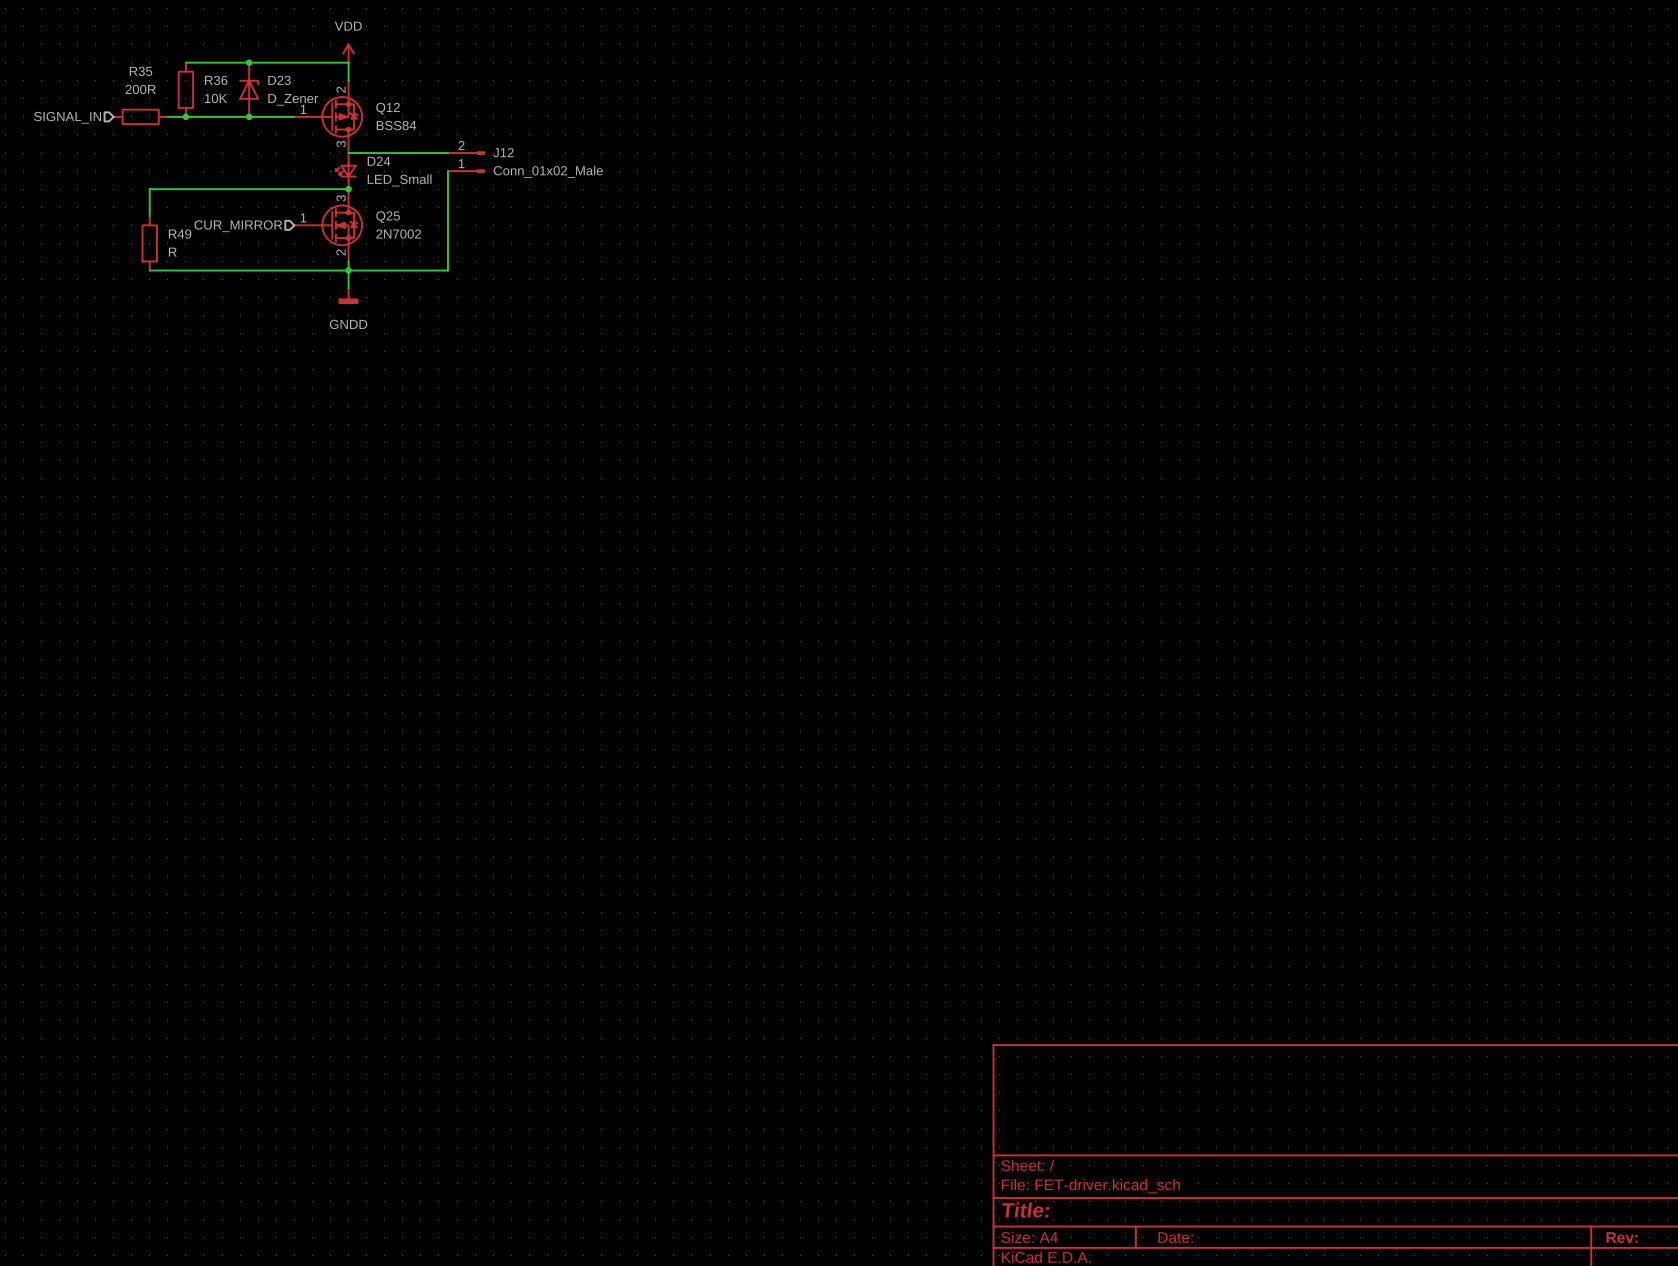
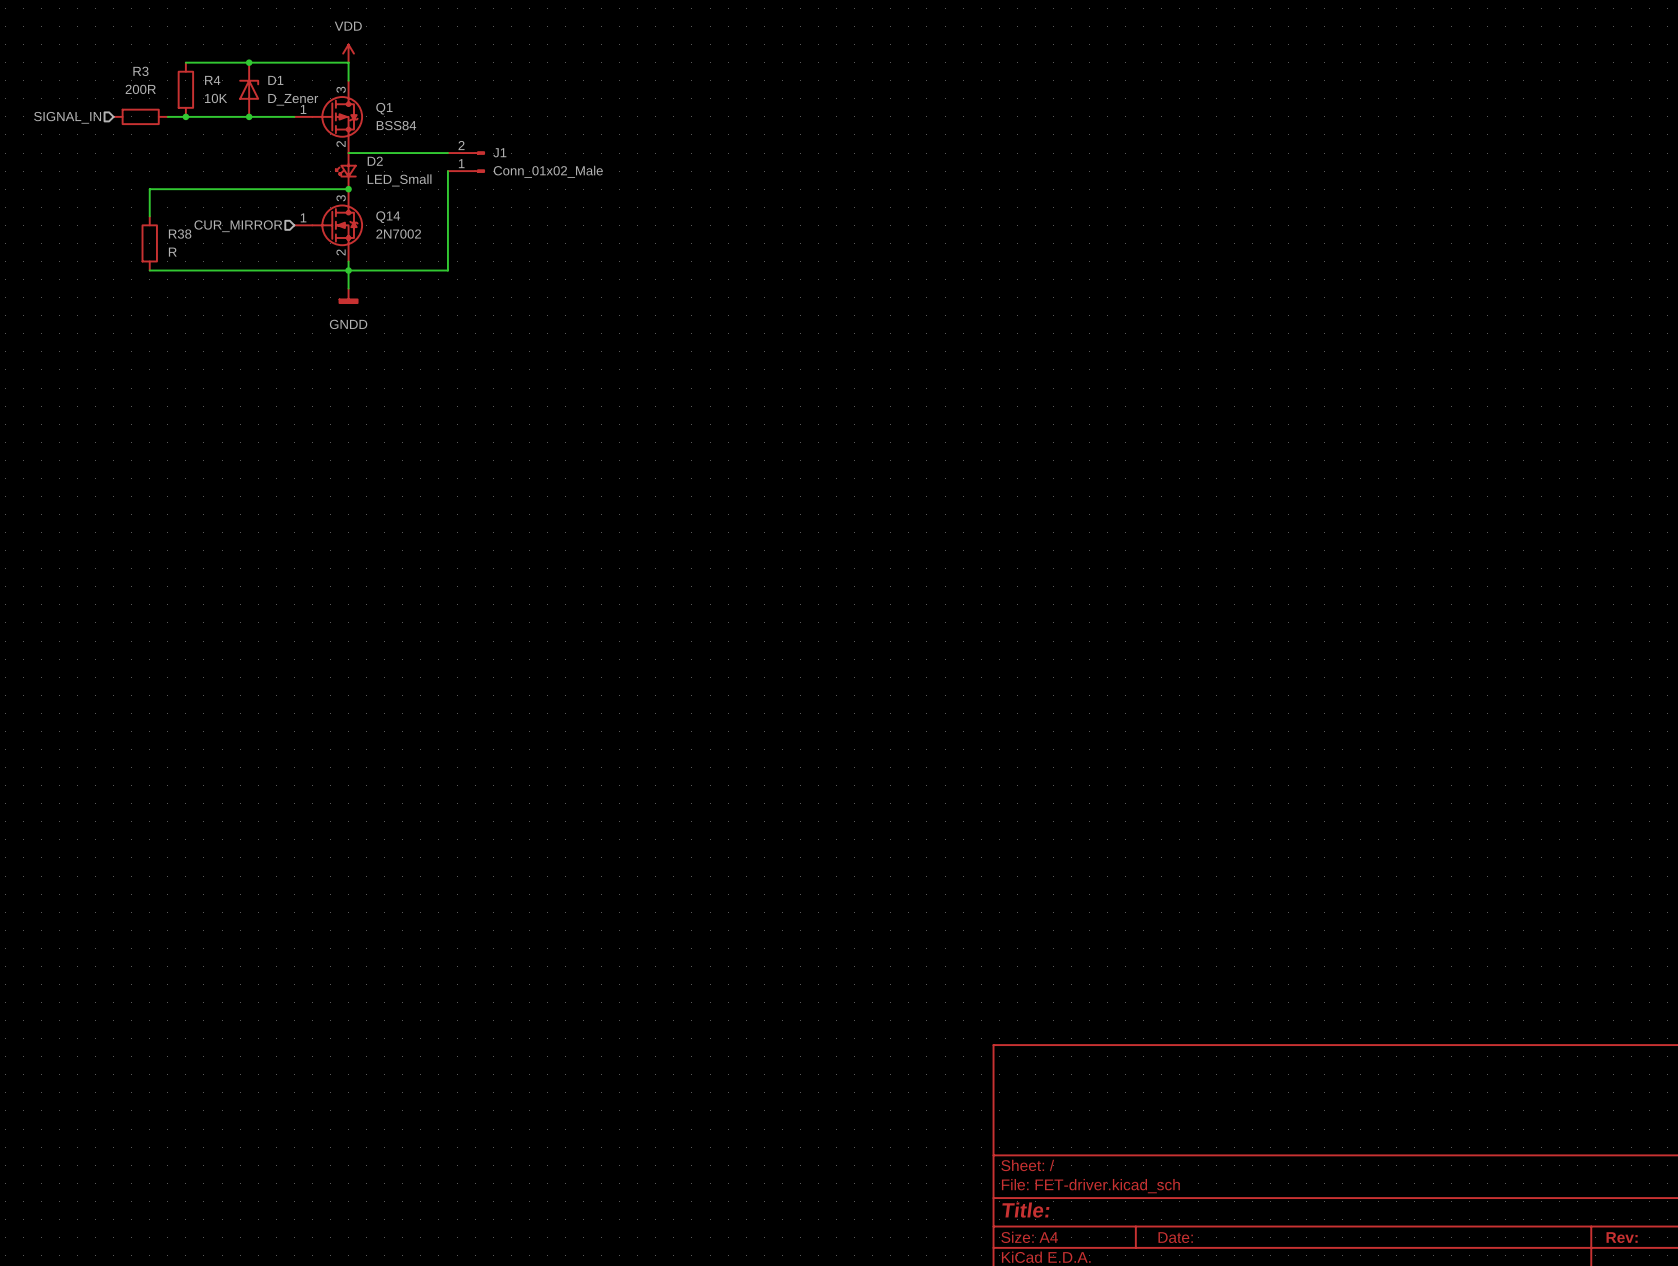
R35 name: R35 (140, 71) -> R3 (140, 71)
R36 name: R36 (216, 80) -> R4 (212, 80)
D23 name: D23 (279, 80) -> D1 (275, 80)
Q12: BSS84 (328, 116) -> none
Q1: none -> BSS84 (328, 116)
J12 name: J12 (503, 152) -> J1 (499, 152)
D24 name: D24 (379, 161) -> D2 (375, 161)
Q25 name: Q25 (388, 217) -> Q14 (388, 217)
R49 name: R49 (180, 234) -> R38 (180, 234)

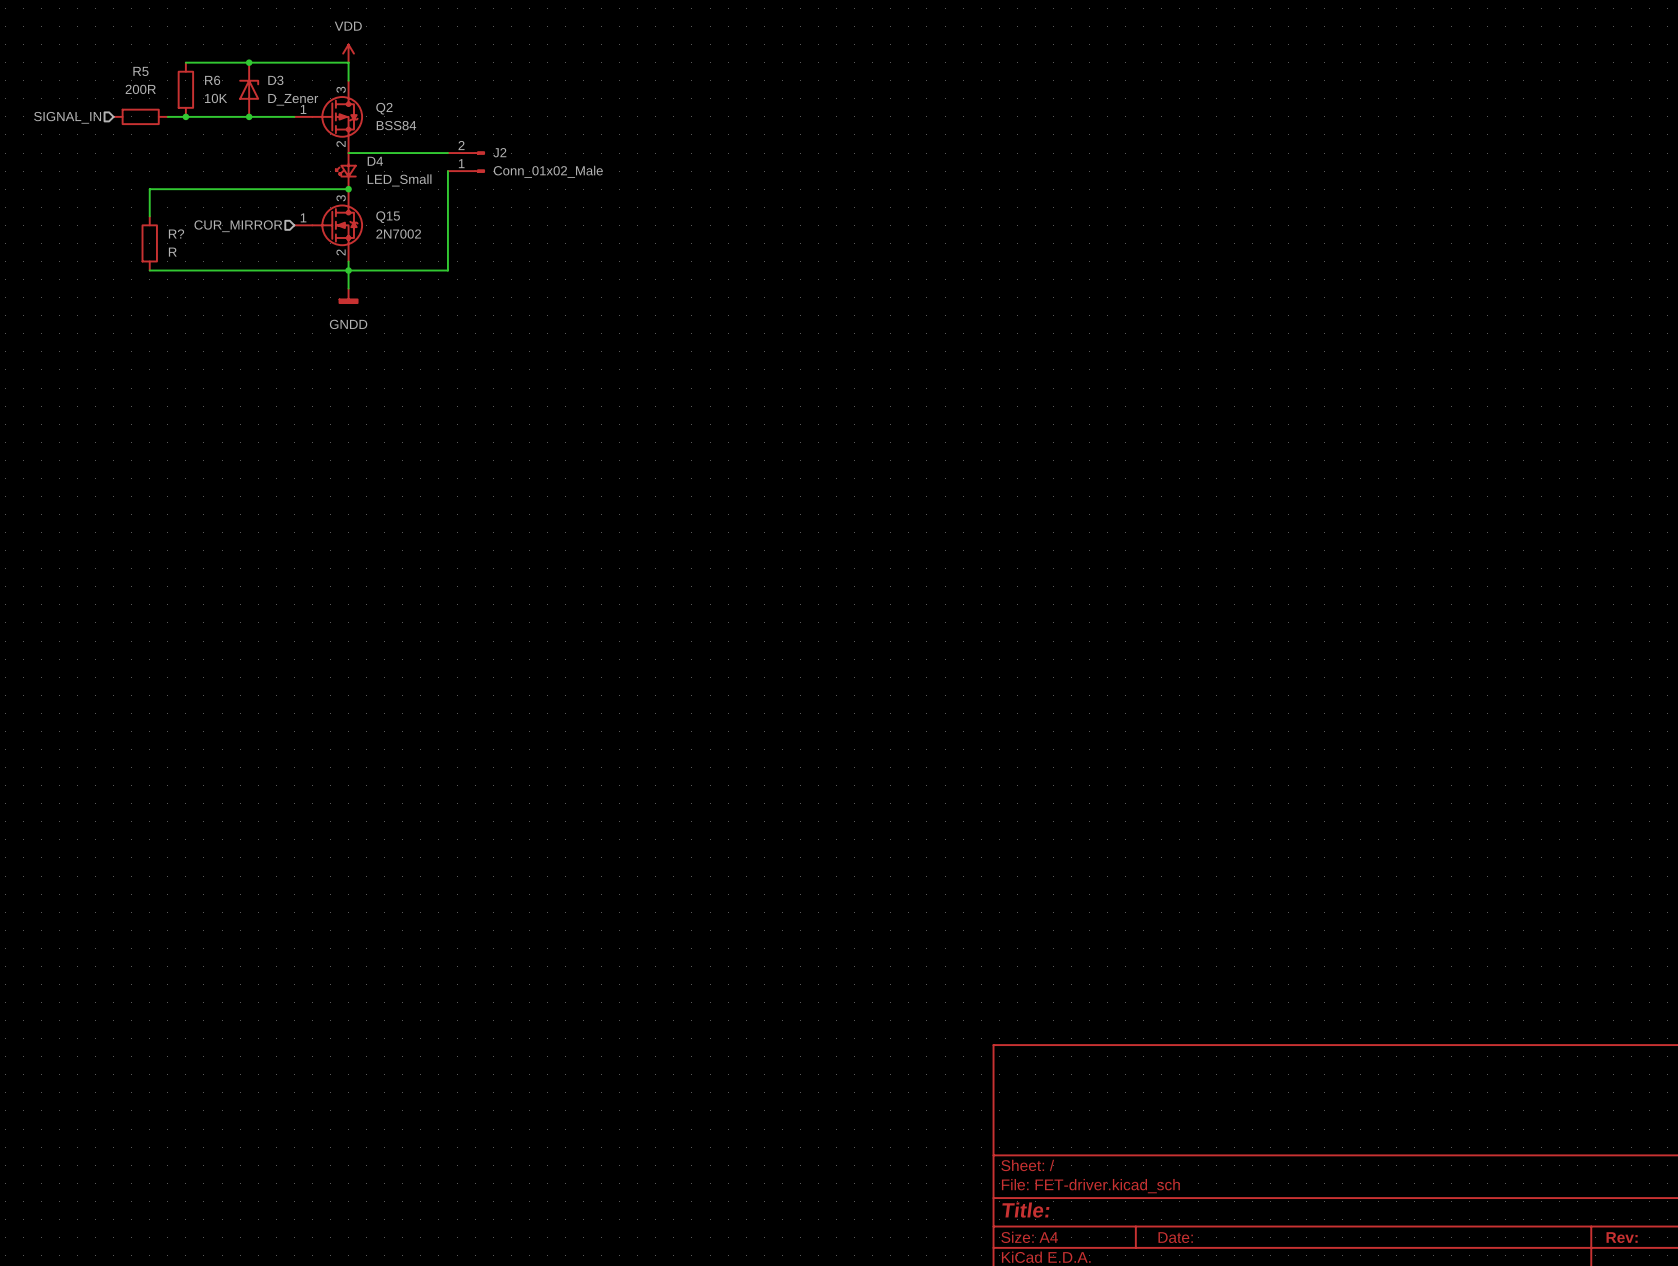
R3 name: R3 (140, 71) -> R5 (140, 71)
R4 name: R4 (212, 80) -> R6 (212, 80)
D1 name: D1 (275, 80) -> D3 (275, 80)
Q1 name: Q1 (384, 108) -> Q2 (384, 108)
J1 name: J1 (499, 152) -> J2 (499, 152)
D2 name: D2 (375, 161) -> D4 (375, 161)
Q14 name: Q14 (388, 217) -> Q15 (388, 217)
R38 name: R38 (180, 234) -> R? (176, 233)

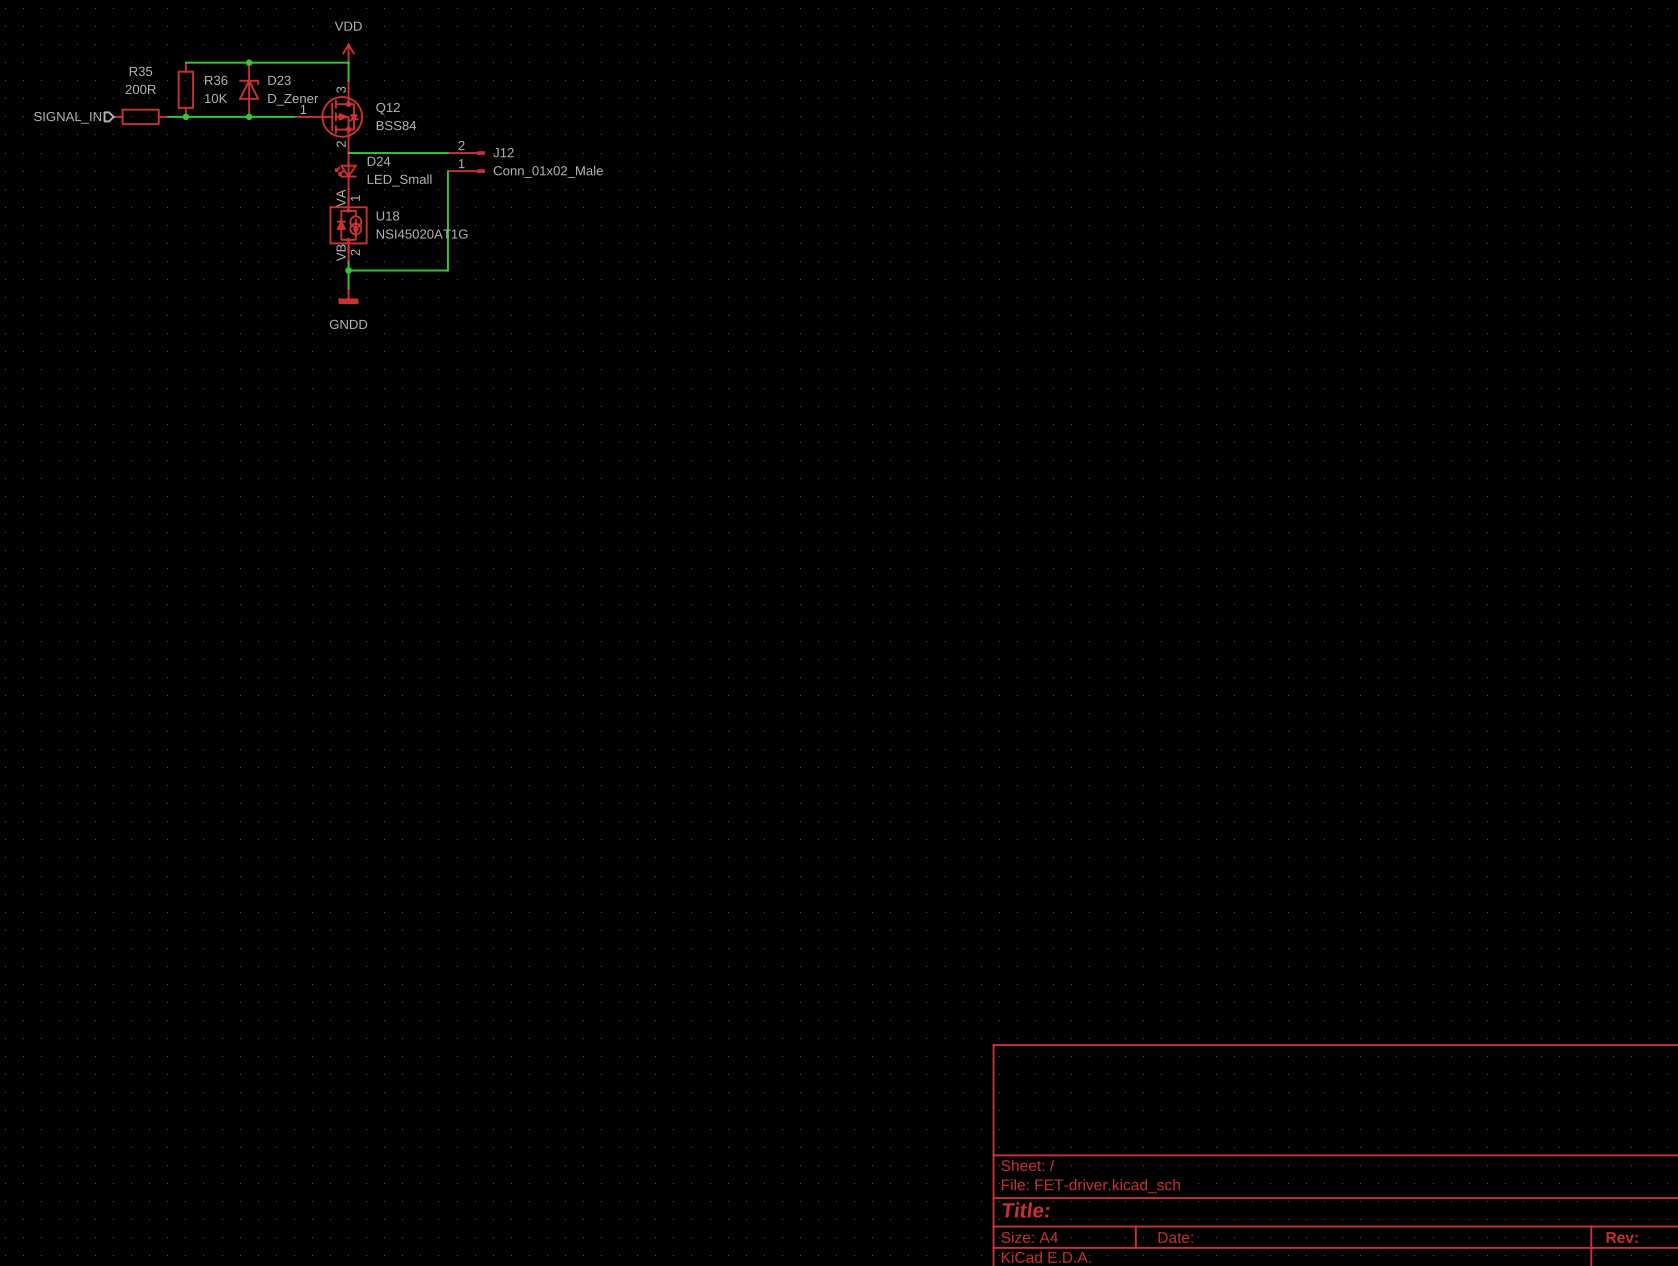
R5 name: R5 (140, 71) -> R35 (140, 71)
R6 name: R6 (212, 80) -> R36 (216, 80)
D3 name: D3 (275, 80) -> D23 (279, 80)
Q2 name: Q2 (384, 108) -> Q12 (388, 108)
J2 name: J2 (499, 152) -> J12 (503, 152)
D4 name: D4 (375, 161) -> D24 (379, 161)
wire: (348, 189) (149, 189) (149, 216) -> none
junction: (348, 189) -> none
Q15: 2N7002 (328, 225) -> none
U18: none -> NSI45020AT1G (348, 225)
hierarchical label: CUR_MIRROR (238, 226) -> none
R?: R (149, 243) -> none
wire: (149, 270) (348, 270) -> none

